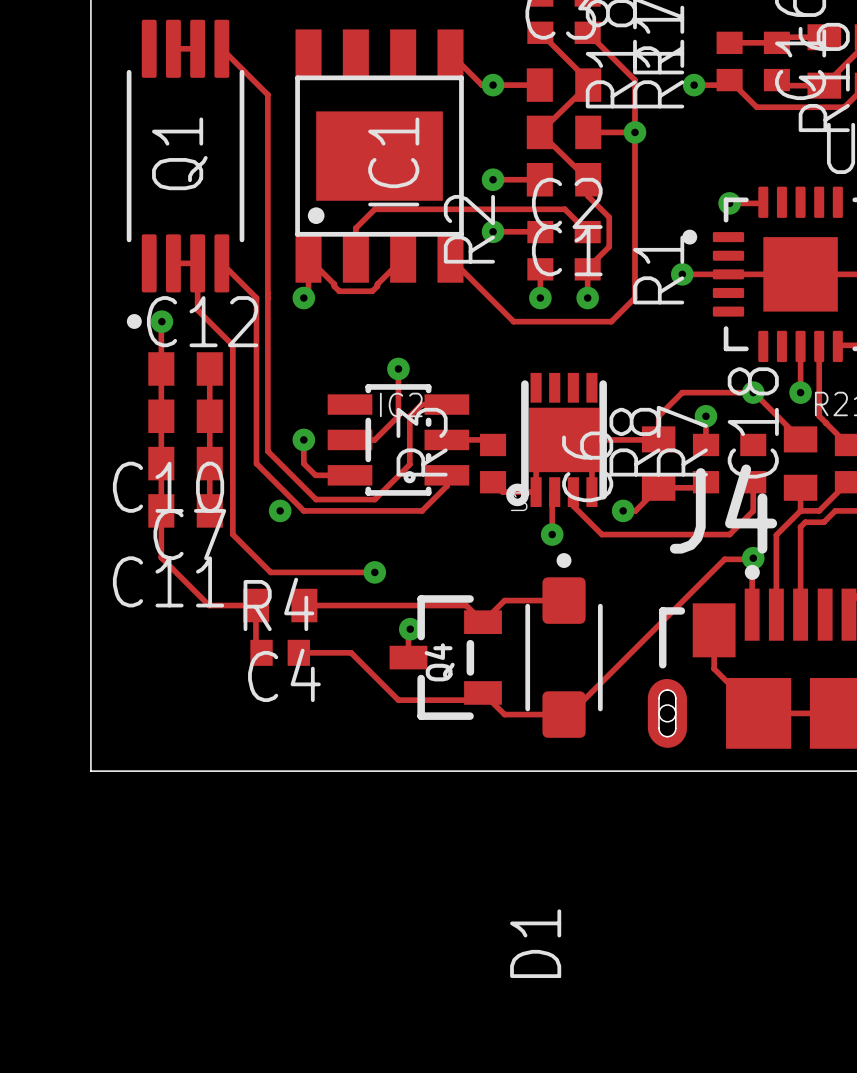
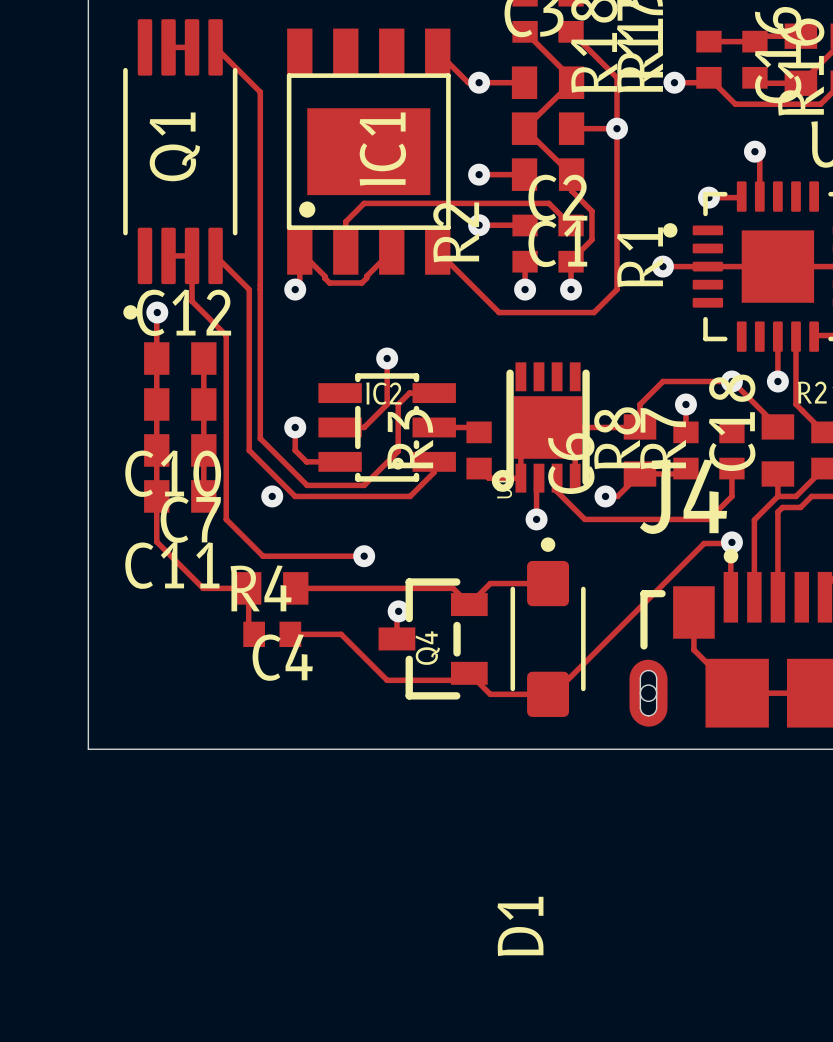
track: none -> (754, 151) (759, 156) (759, 196)
via: none -> (754, 151)

